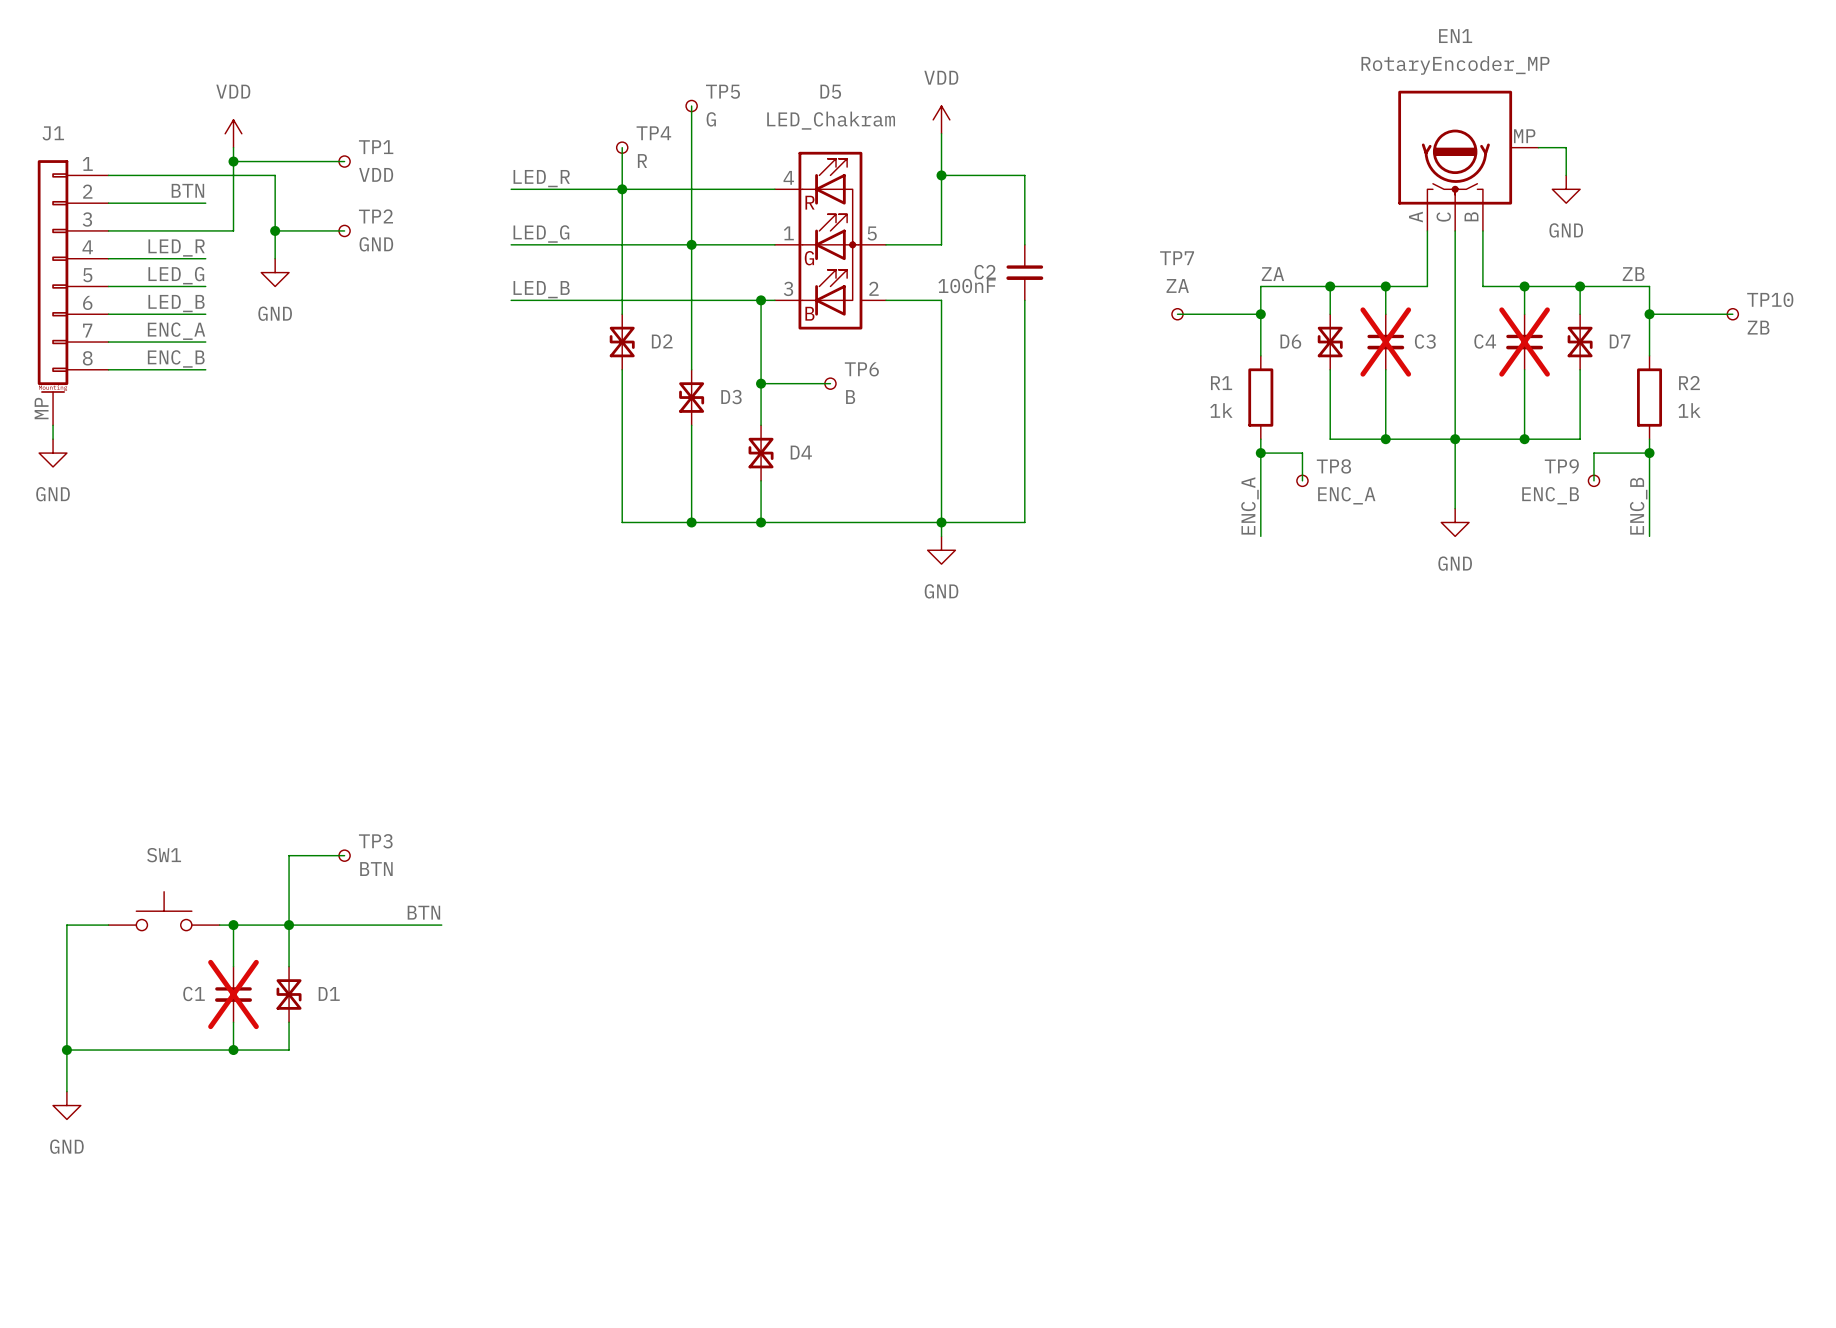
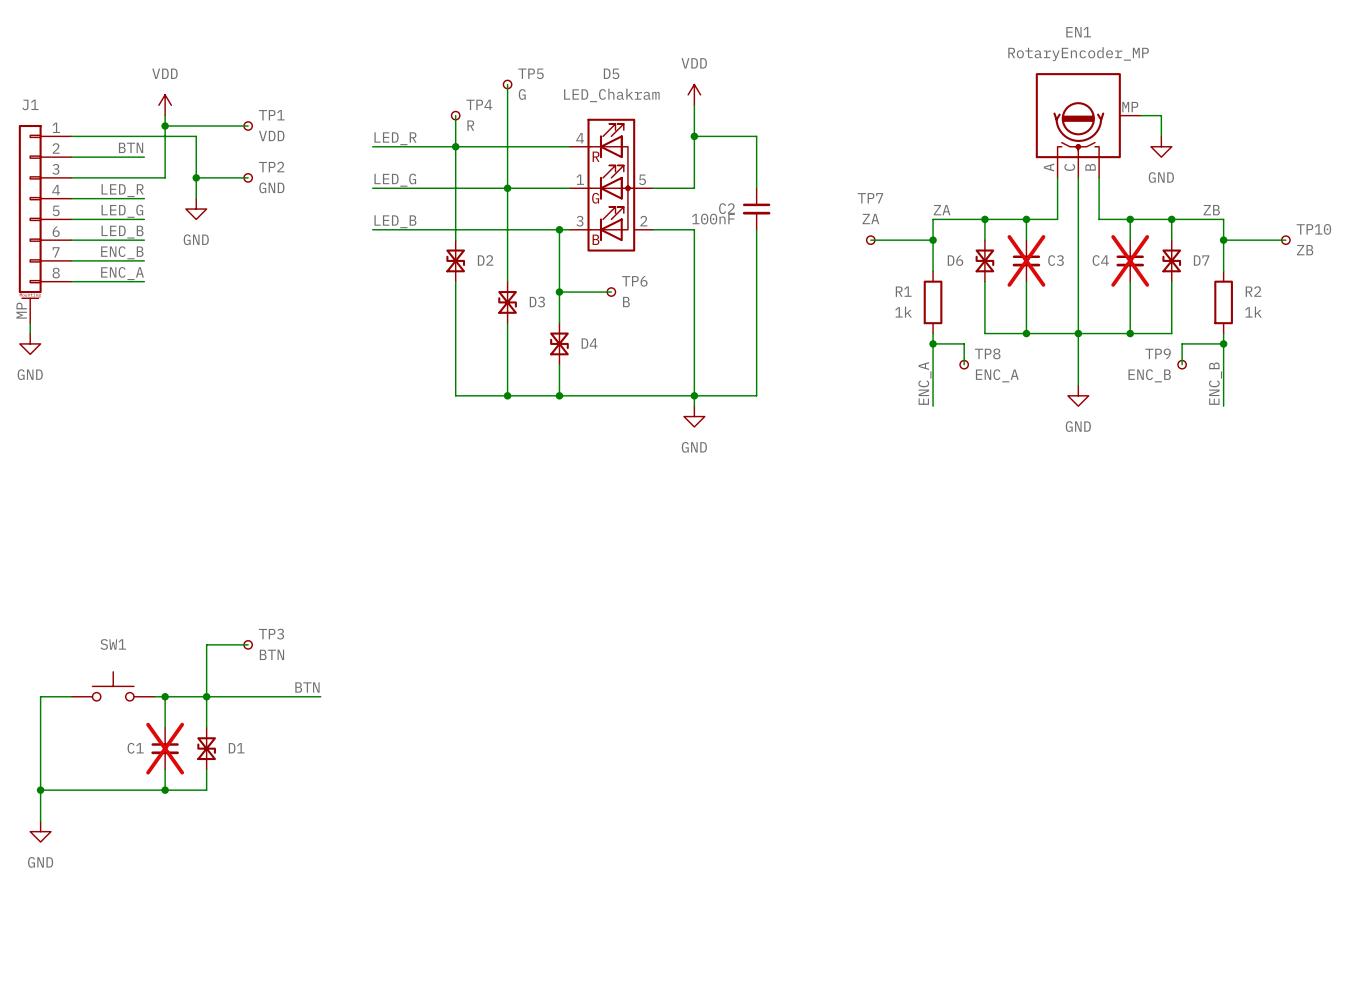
label: ENC_A (176, 331) -> ENC_B (122, 252)
label: ENC_B (176, 358) -> ENC_A (122, 273)

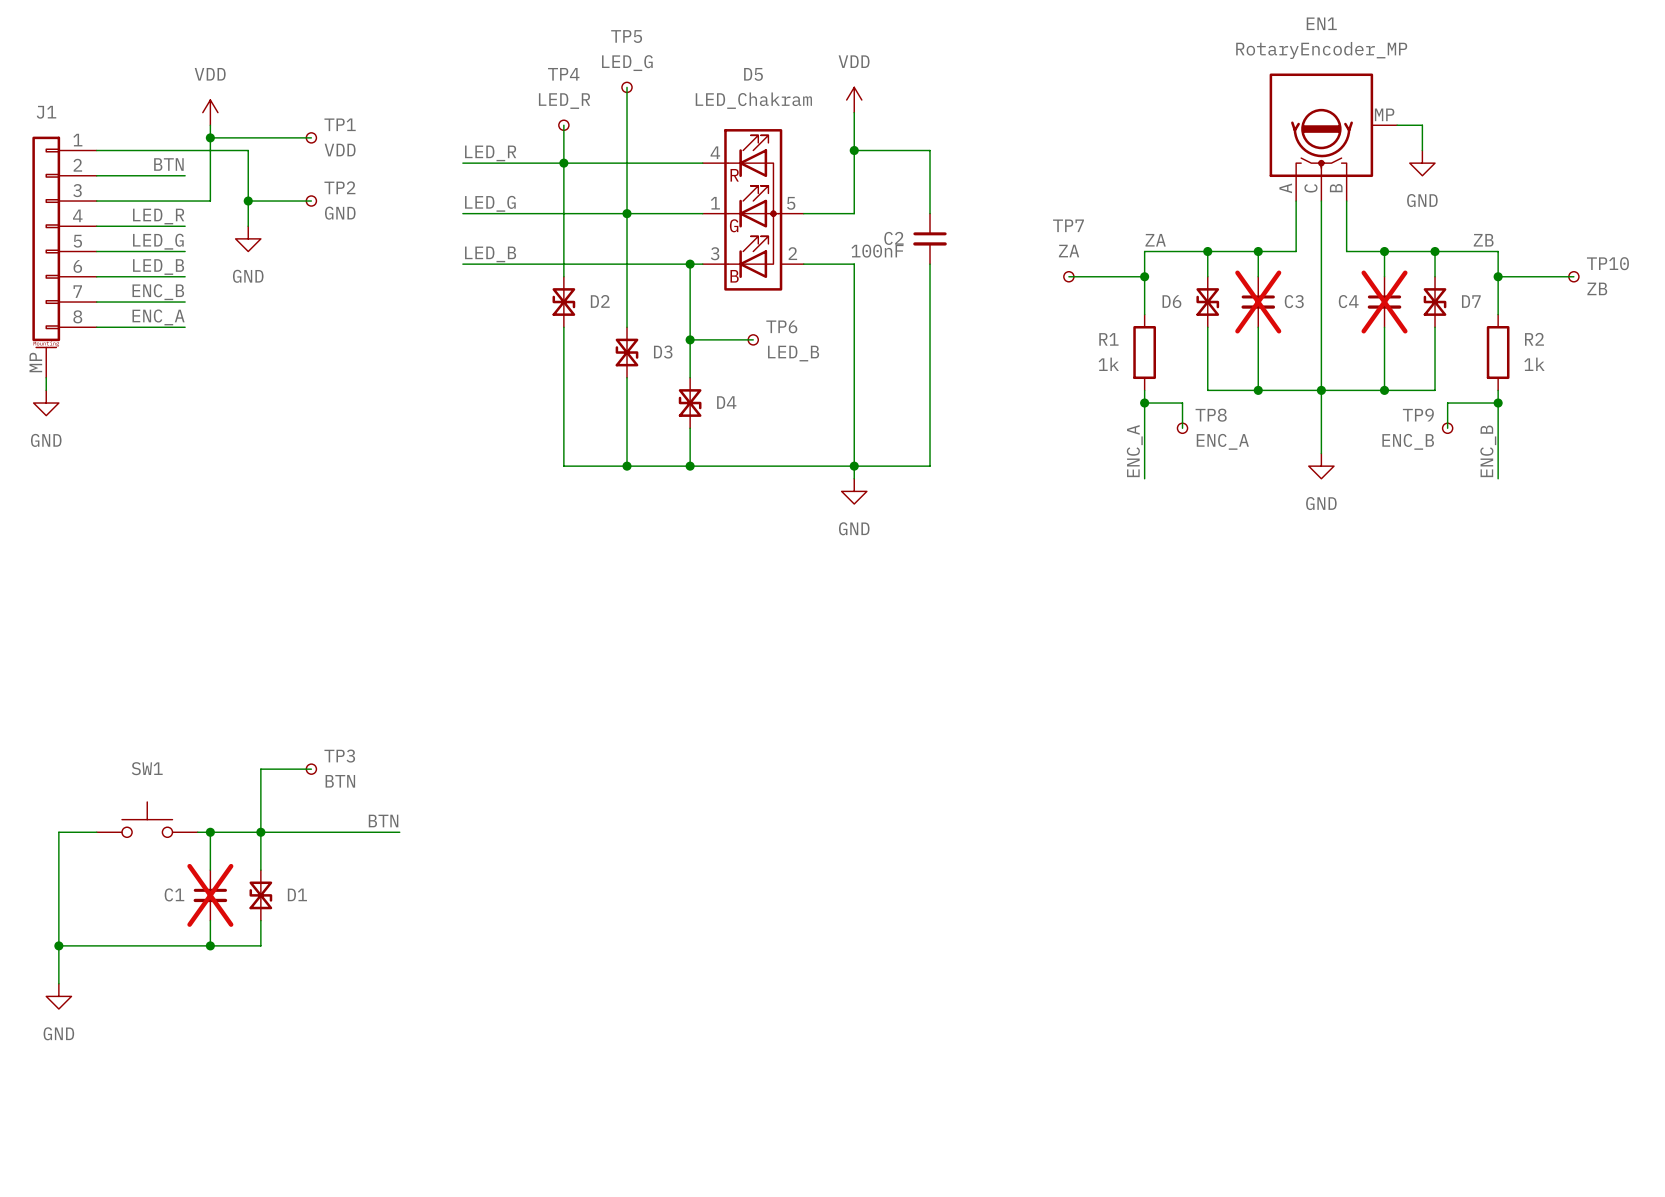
TP5 name position: TP5 (531, 73) -> TP5 (626, 36)
TP5 value: G (522, 94) -> LED_G (627, 63)
TP4 name position: TP4 (479, 104) -> TP4 (563, 74)
TP4 value: R (470, 125) -> LED_R (564, 101)
TP6 value: B (626, 302) -> LED_B (793, 353)

